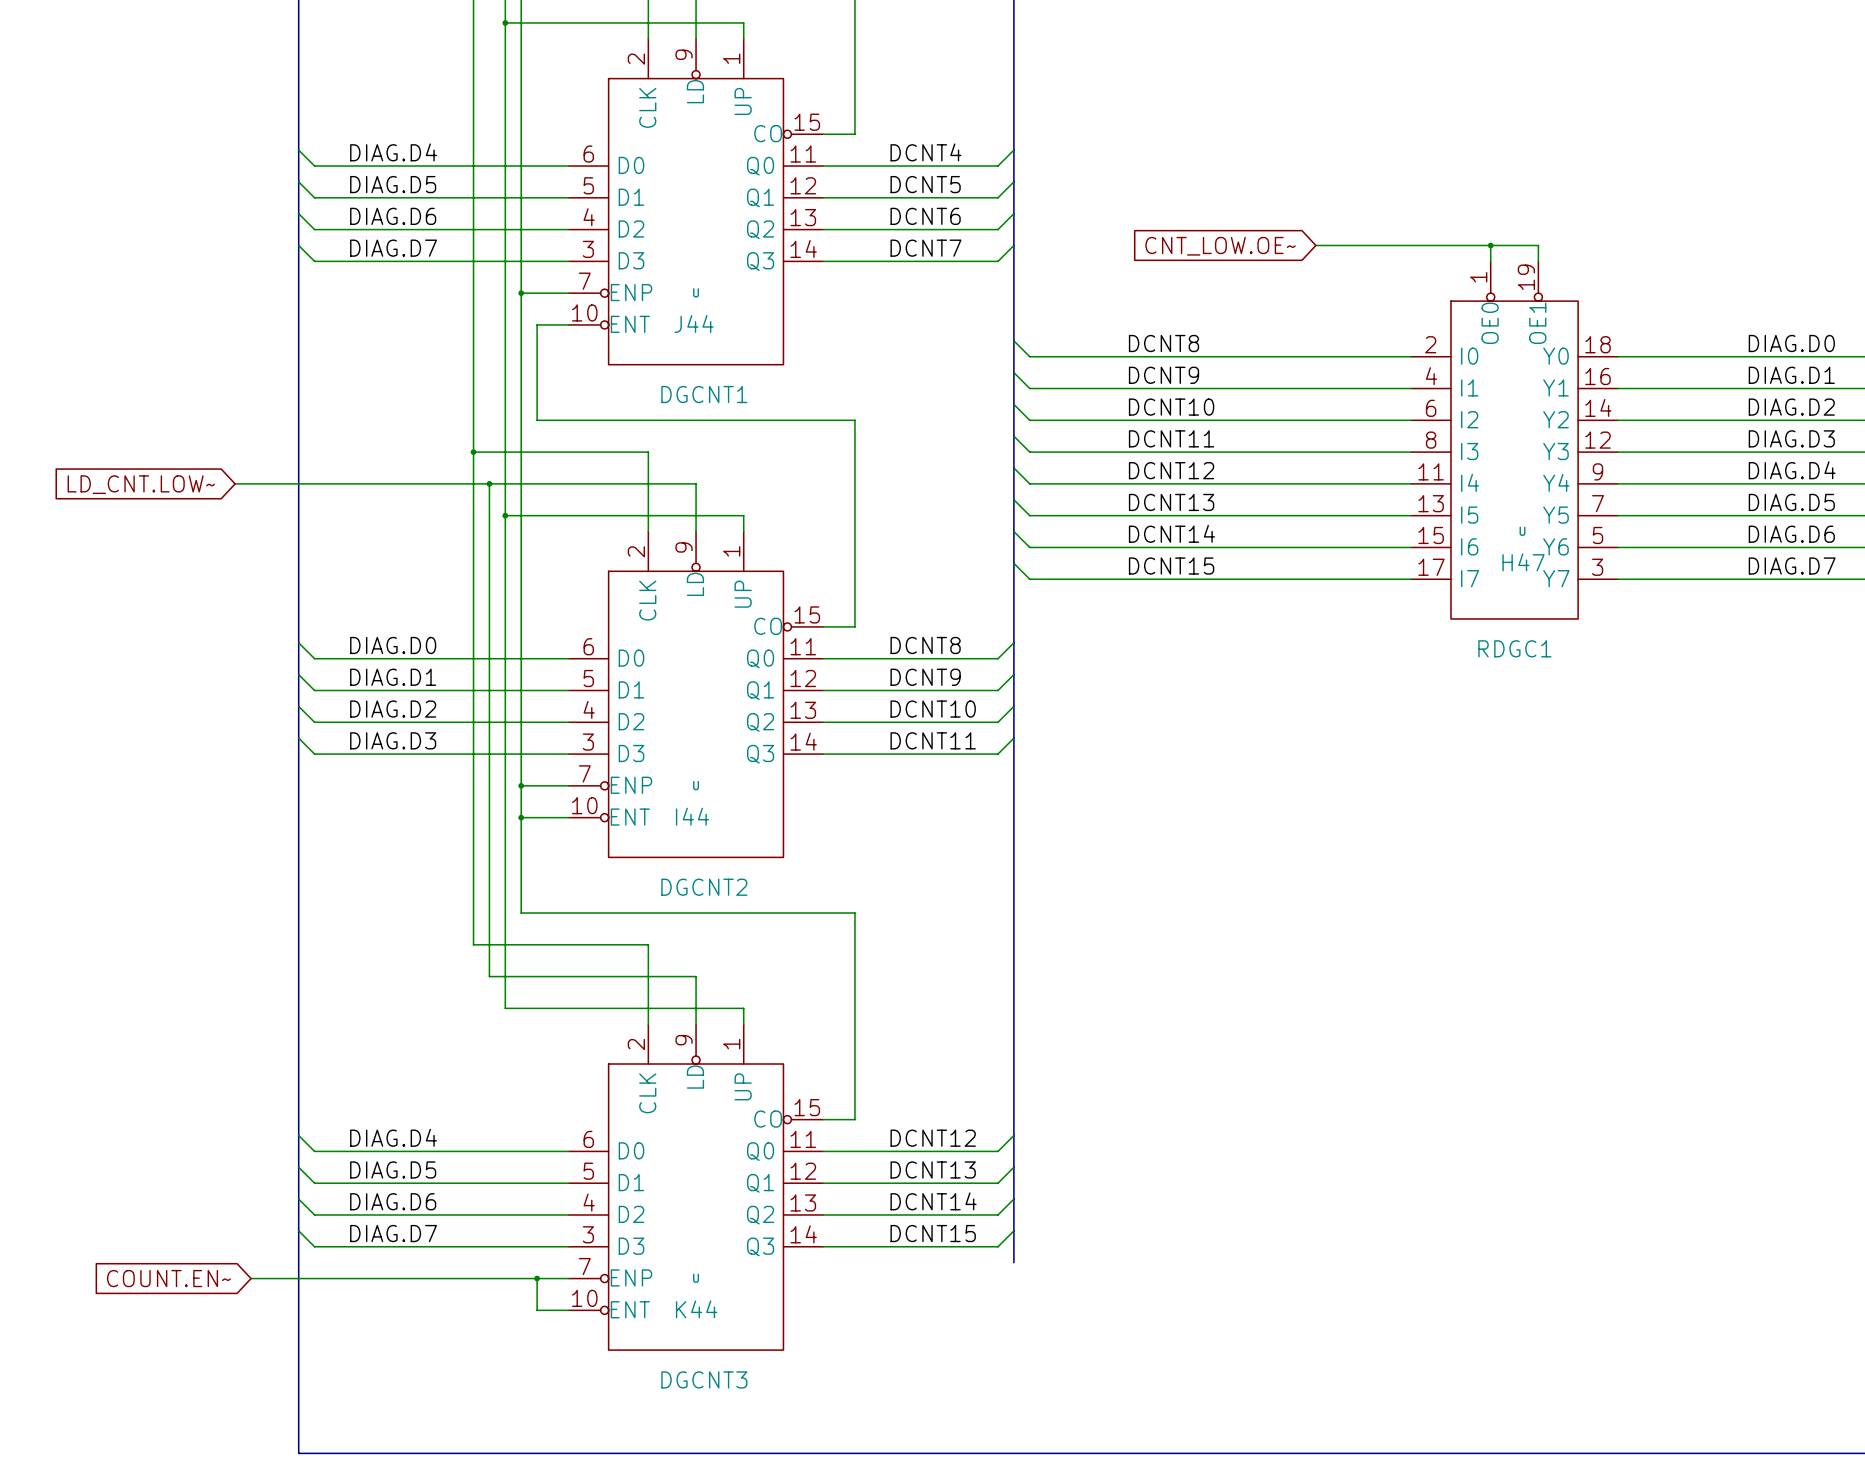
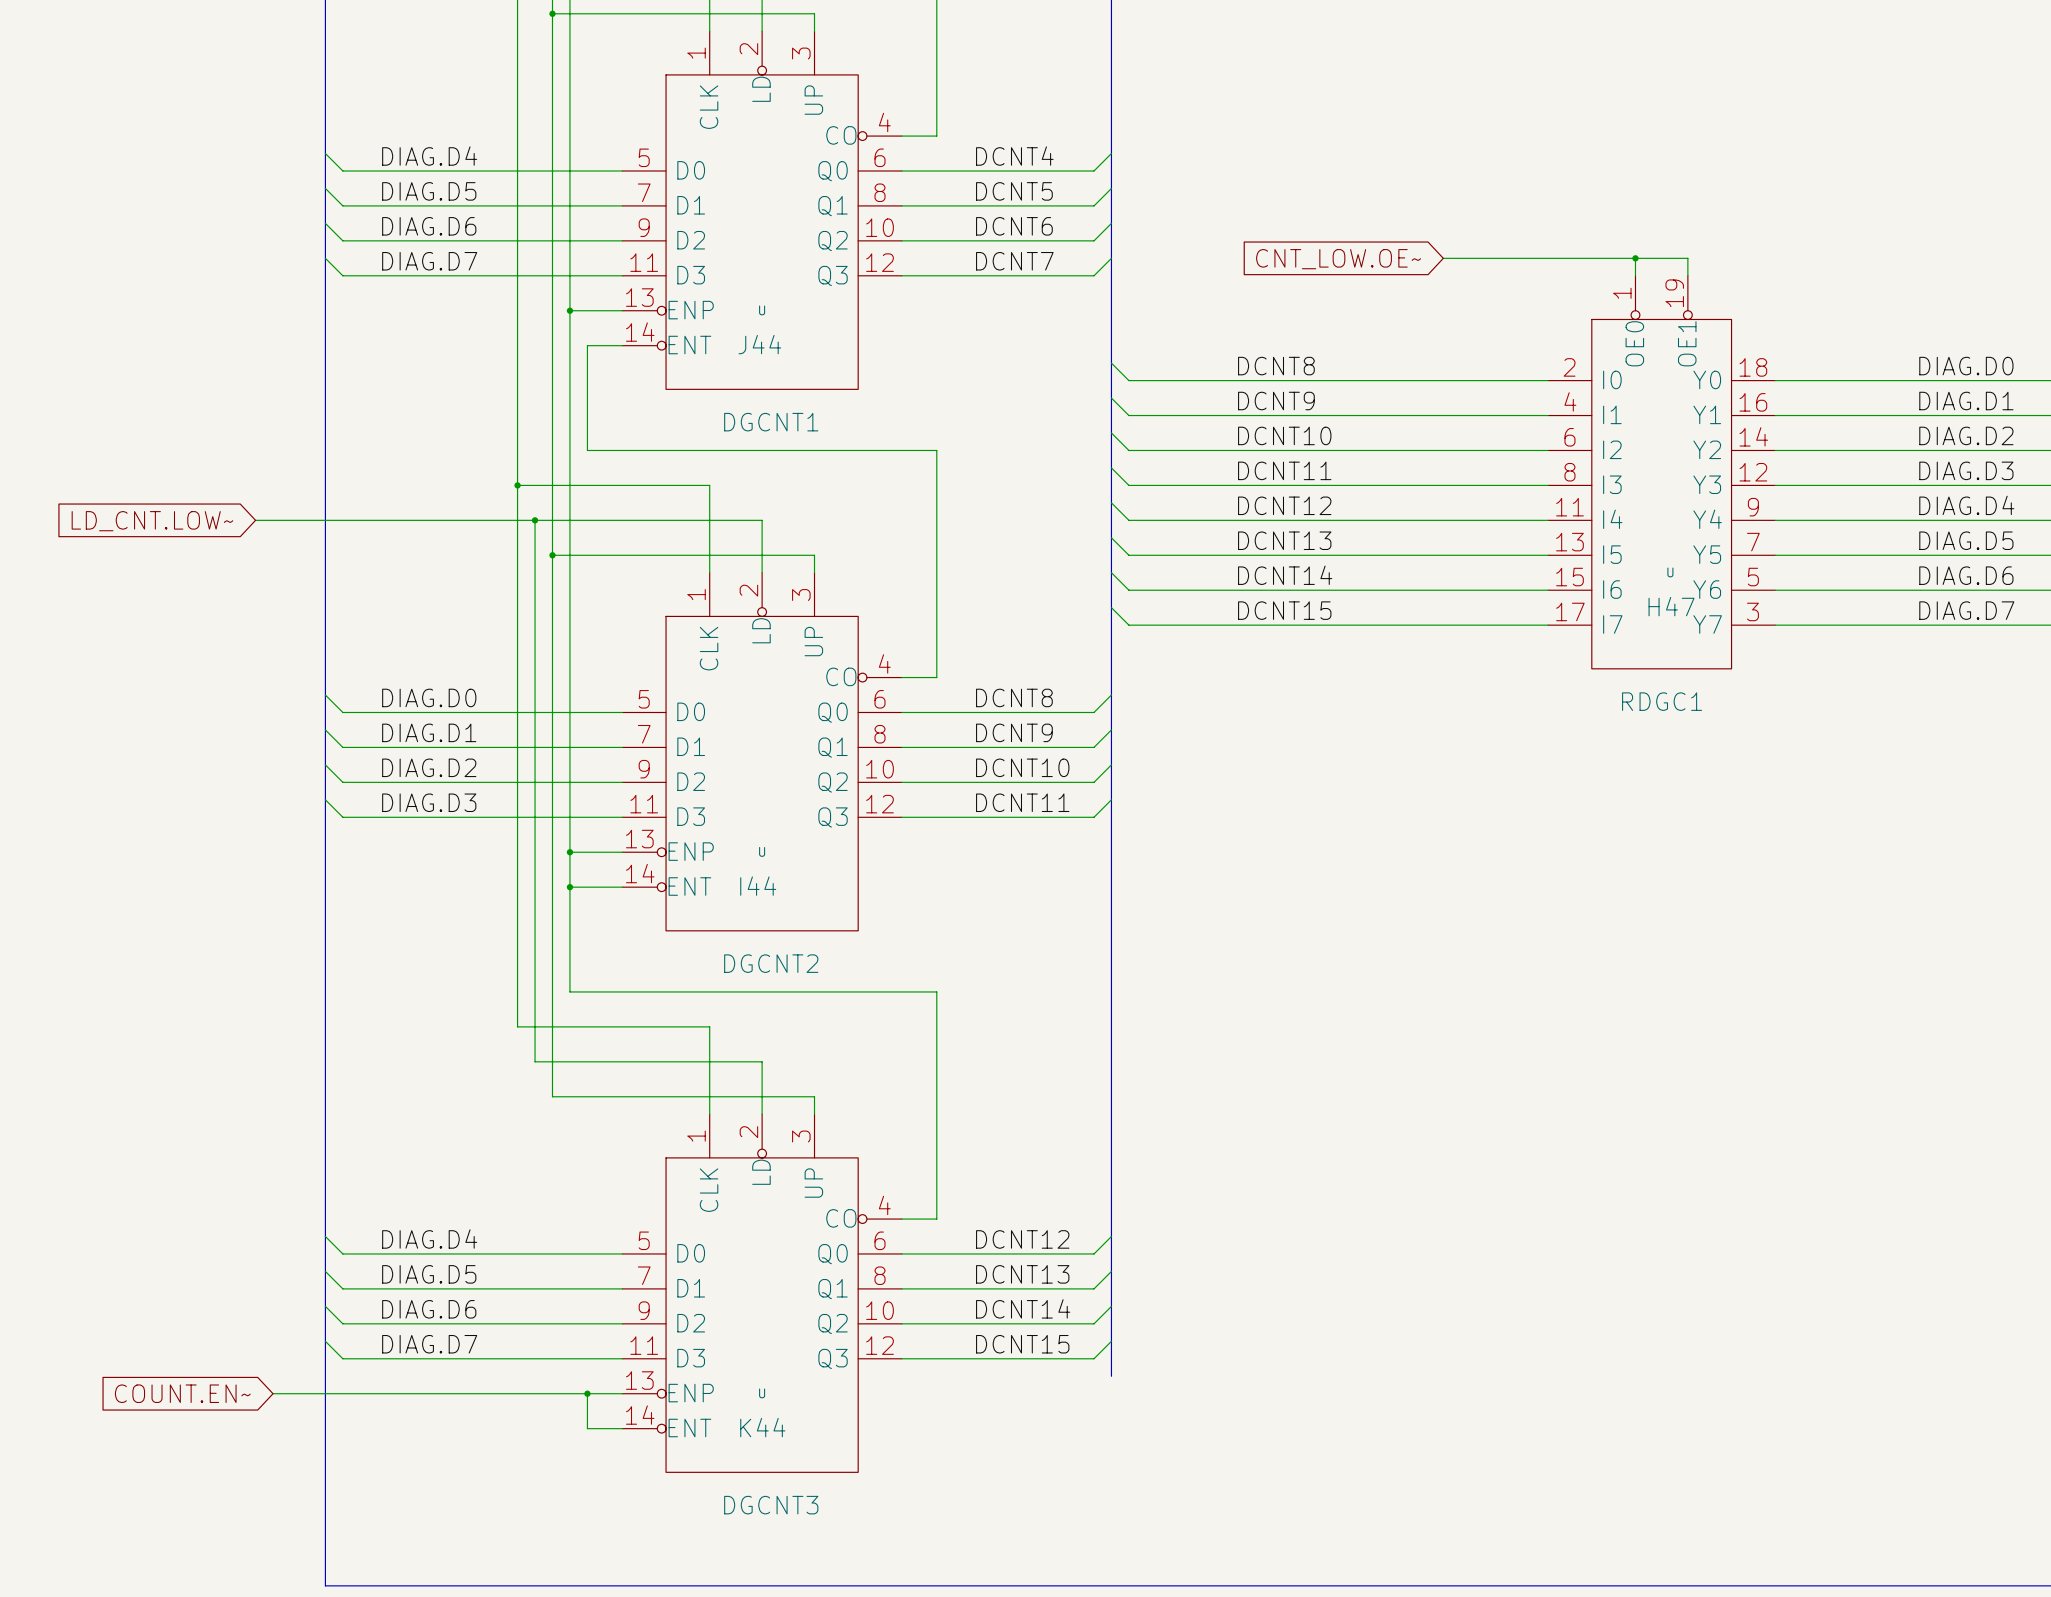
U symbol: [568, 38, 824, 365] -> [622, 31, 902, 390]
U symbol: [568, 531, 824, 858] -> [622, 572, 902, 931]
U symbol: [568, 1024, 824, 1351] -> [622, 1114, 902, 1473]

